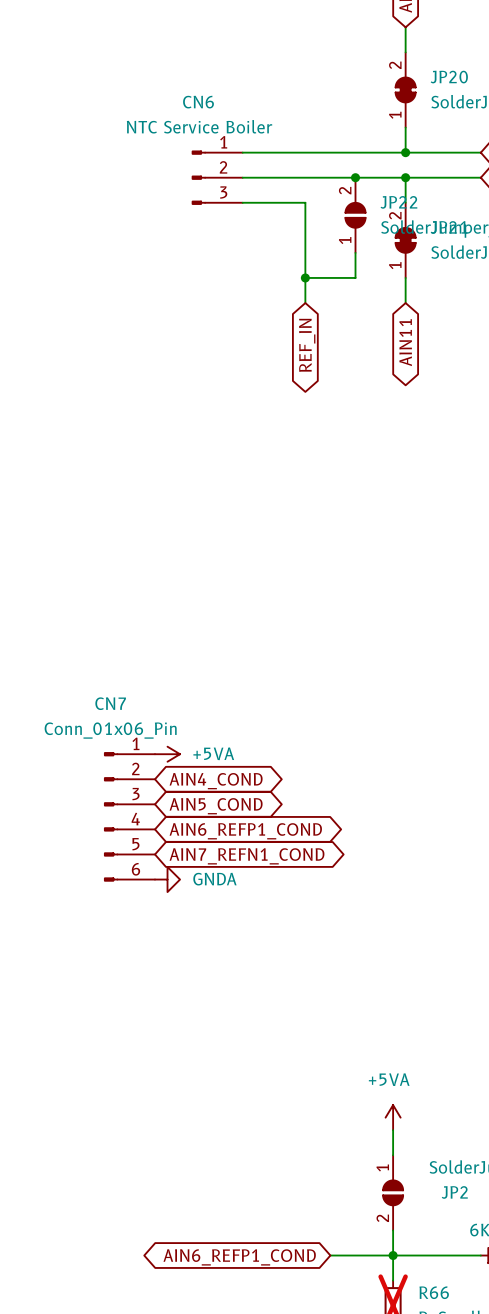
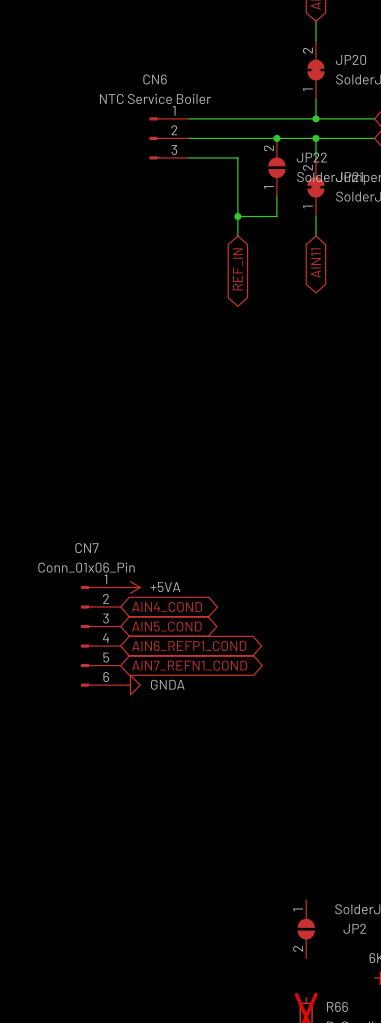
power symbol: +5VA (393, 1117) -> none
wire: (393, 1130) (393, 1155) -> none
wire: (393, 1230) (393, 1280) -> none
wire: (330, 1255) (480, 1255) -> none
junction: (393, 1255) -> none
global label: AIN6_REFP1_COND (239, 1257) -> none

